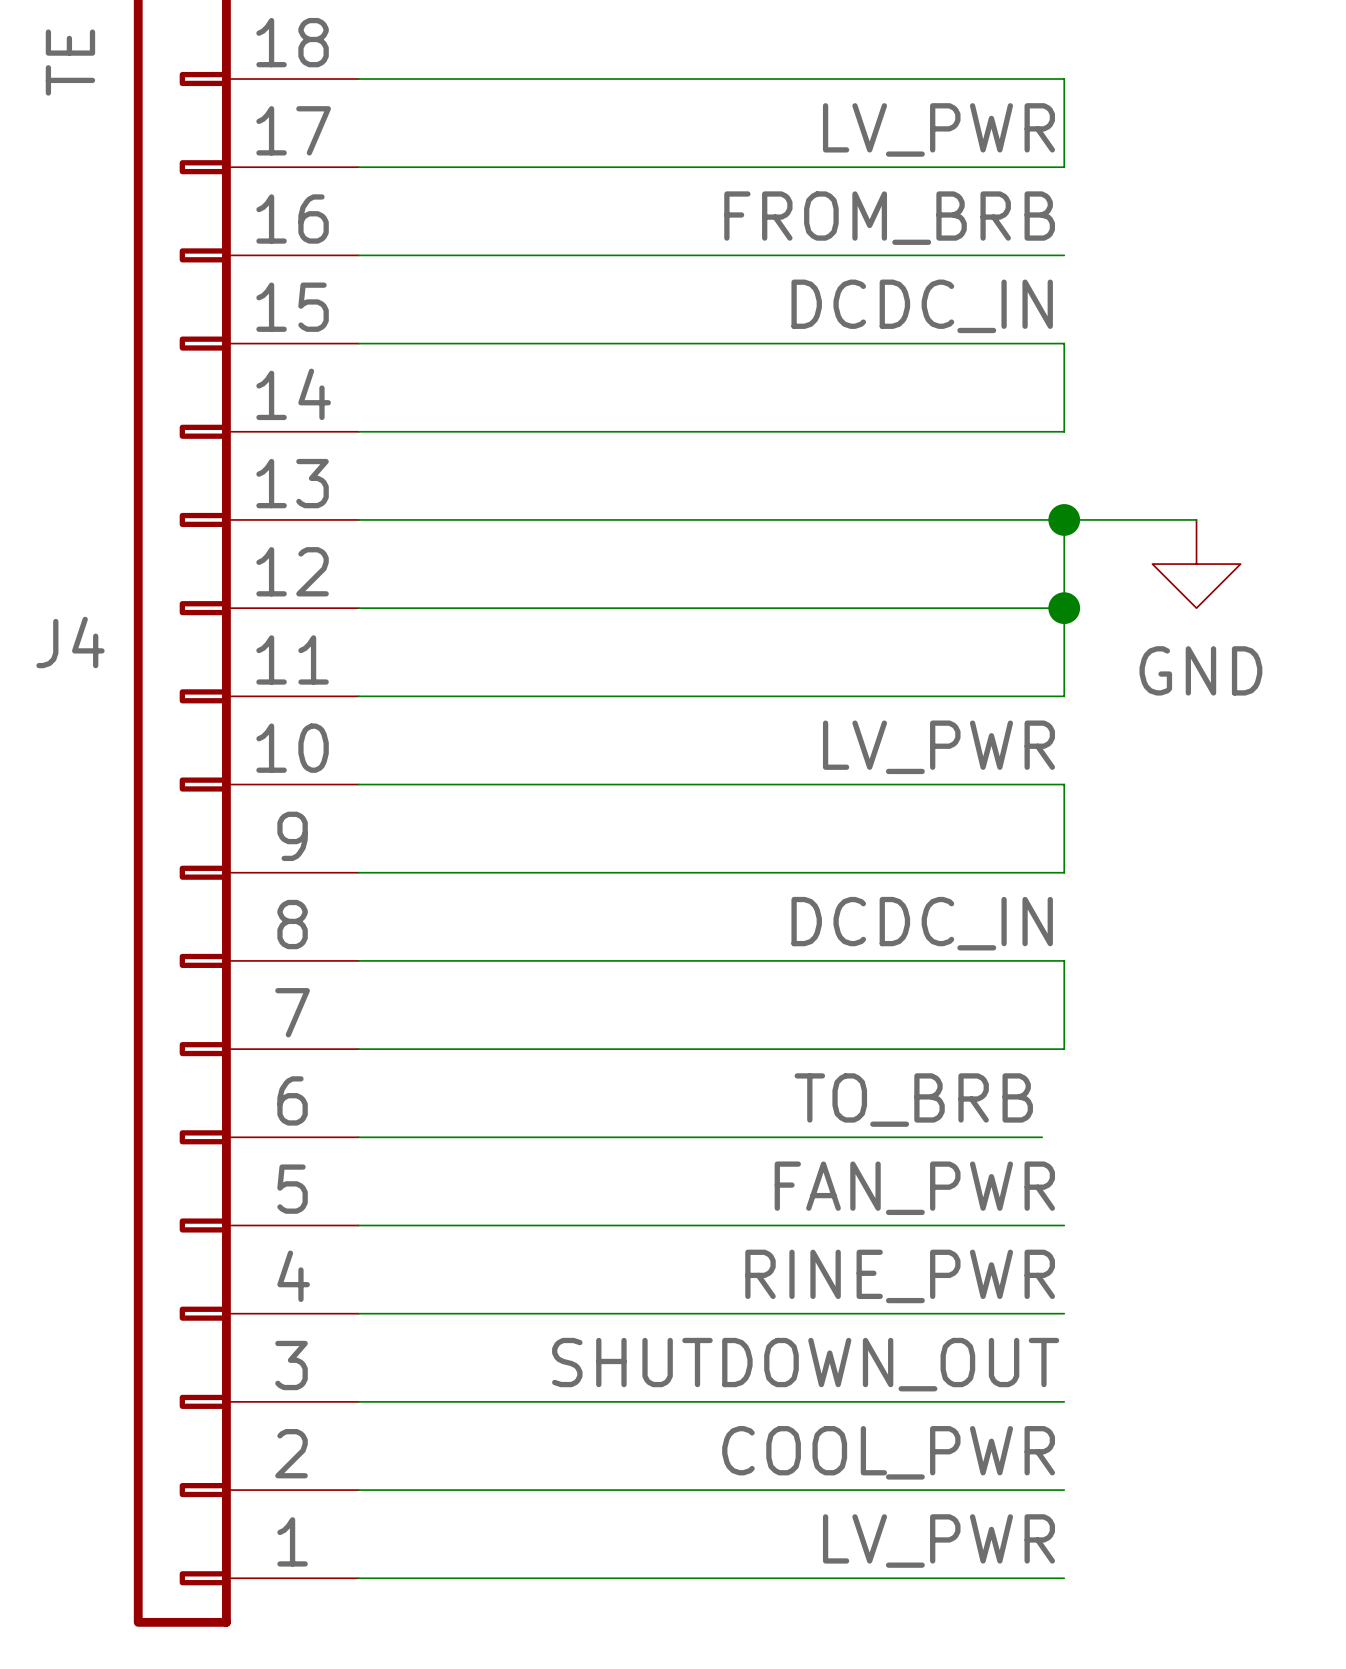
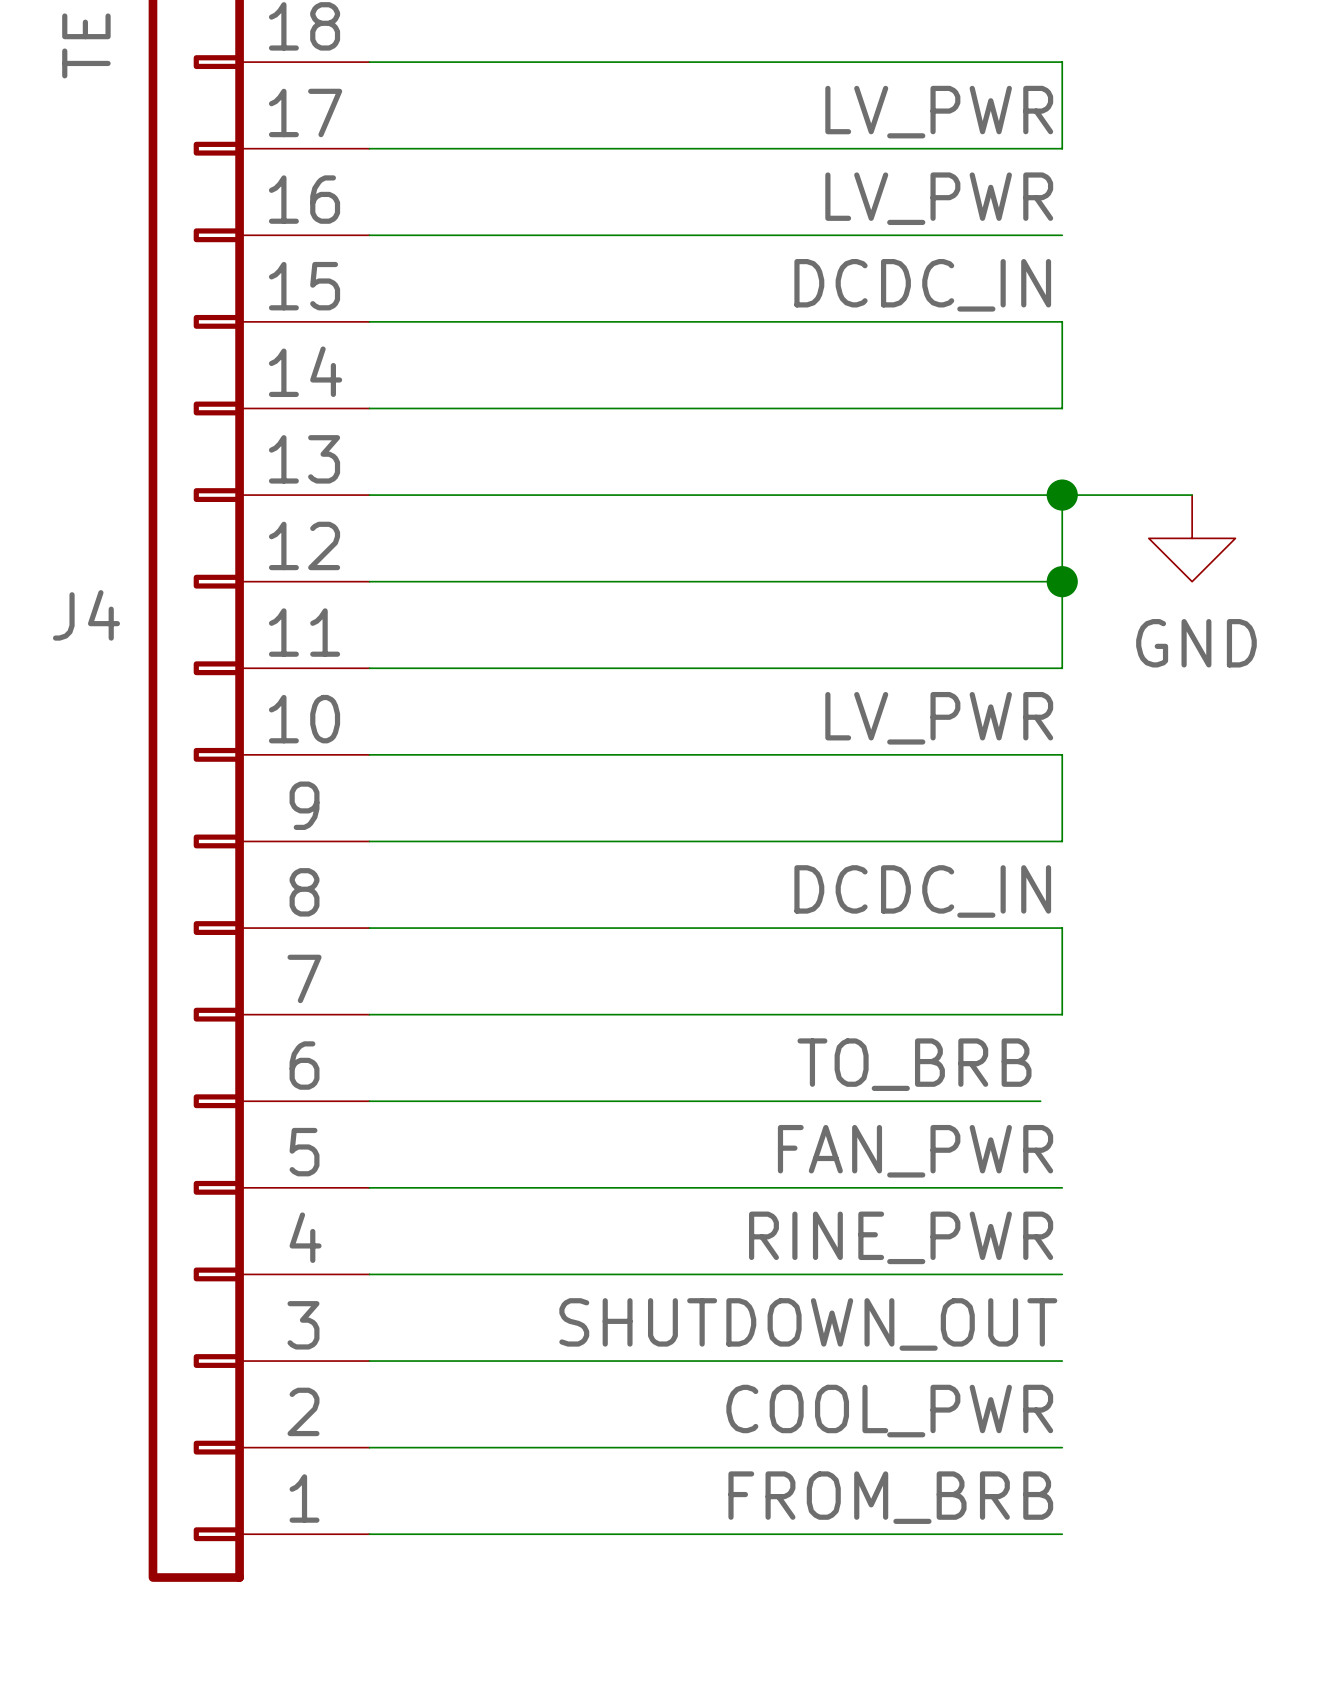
label: FROM_BRB (889, 218) -> LV_PWR (939, 198)
label: LV_PWR (938, 1541) -> FROM_BRB (890, 1497)

